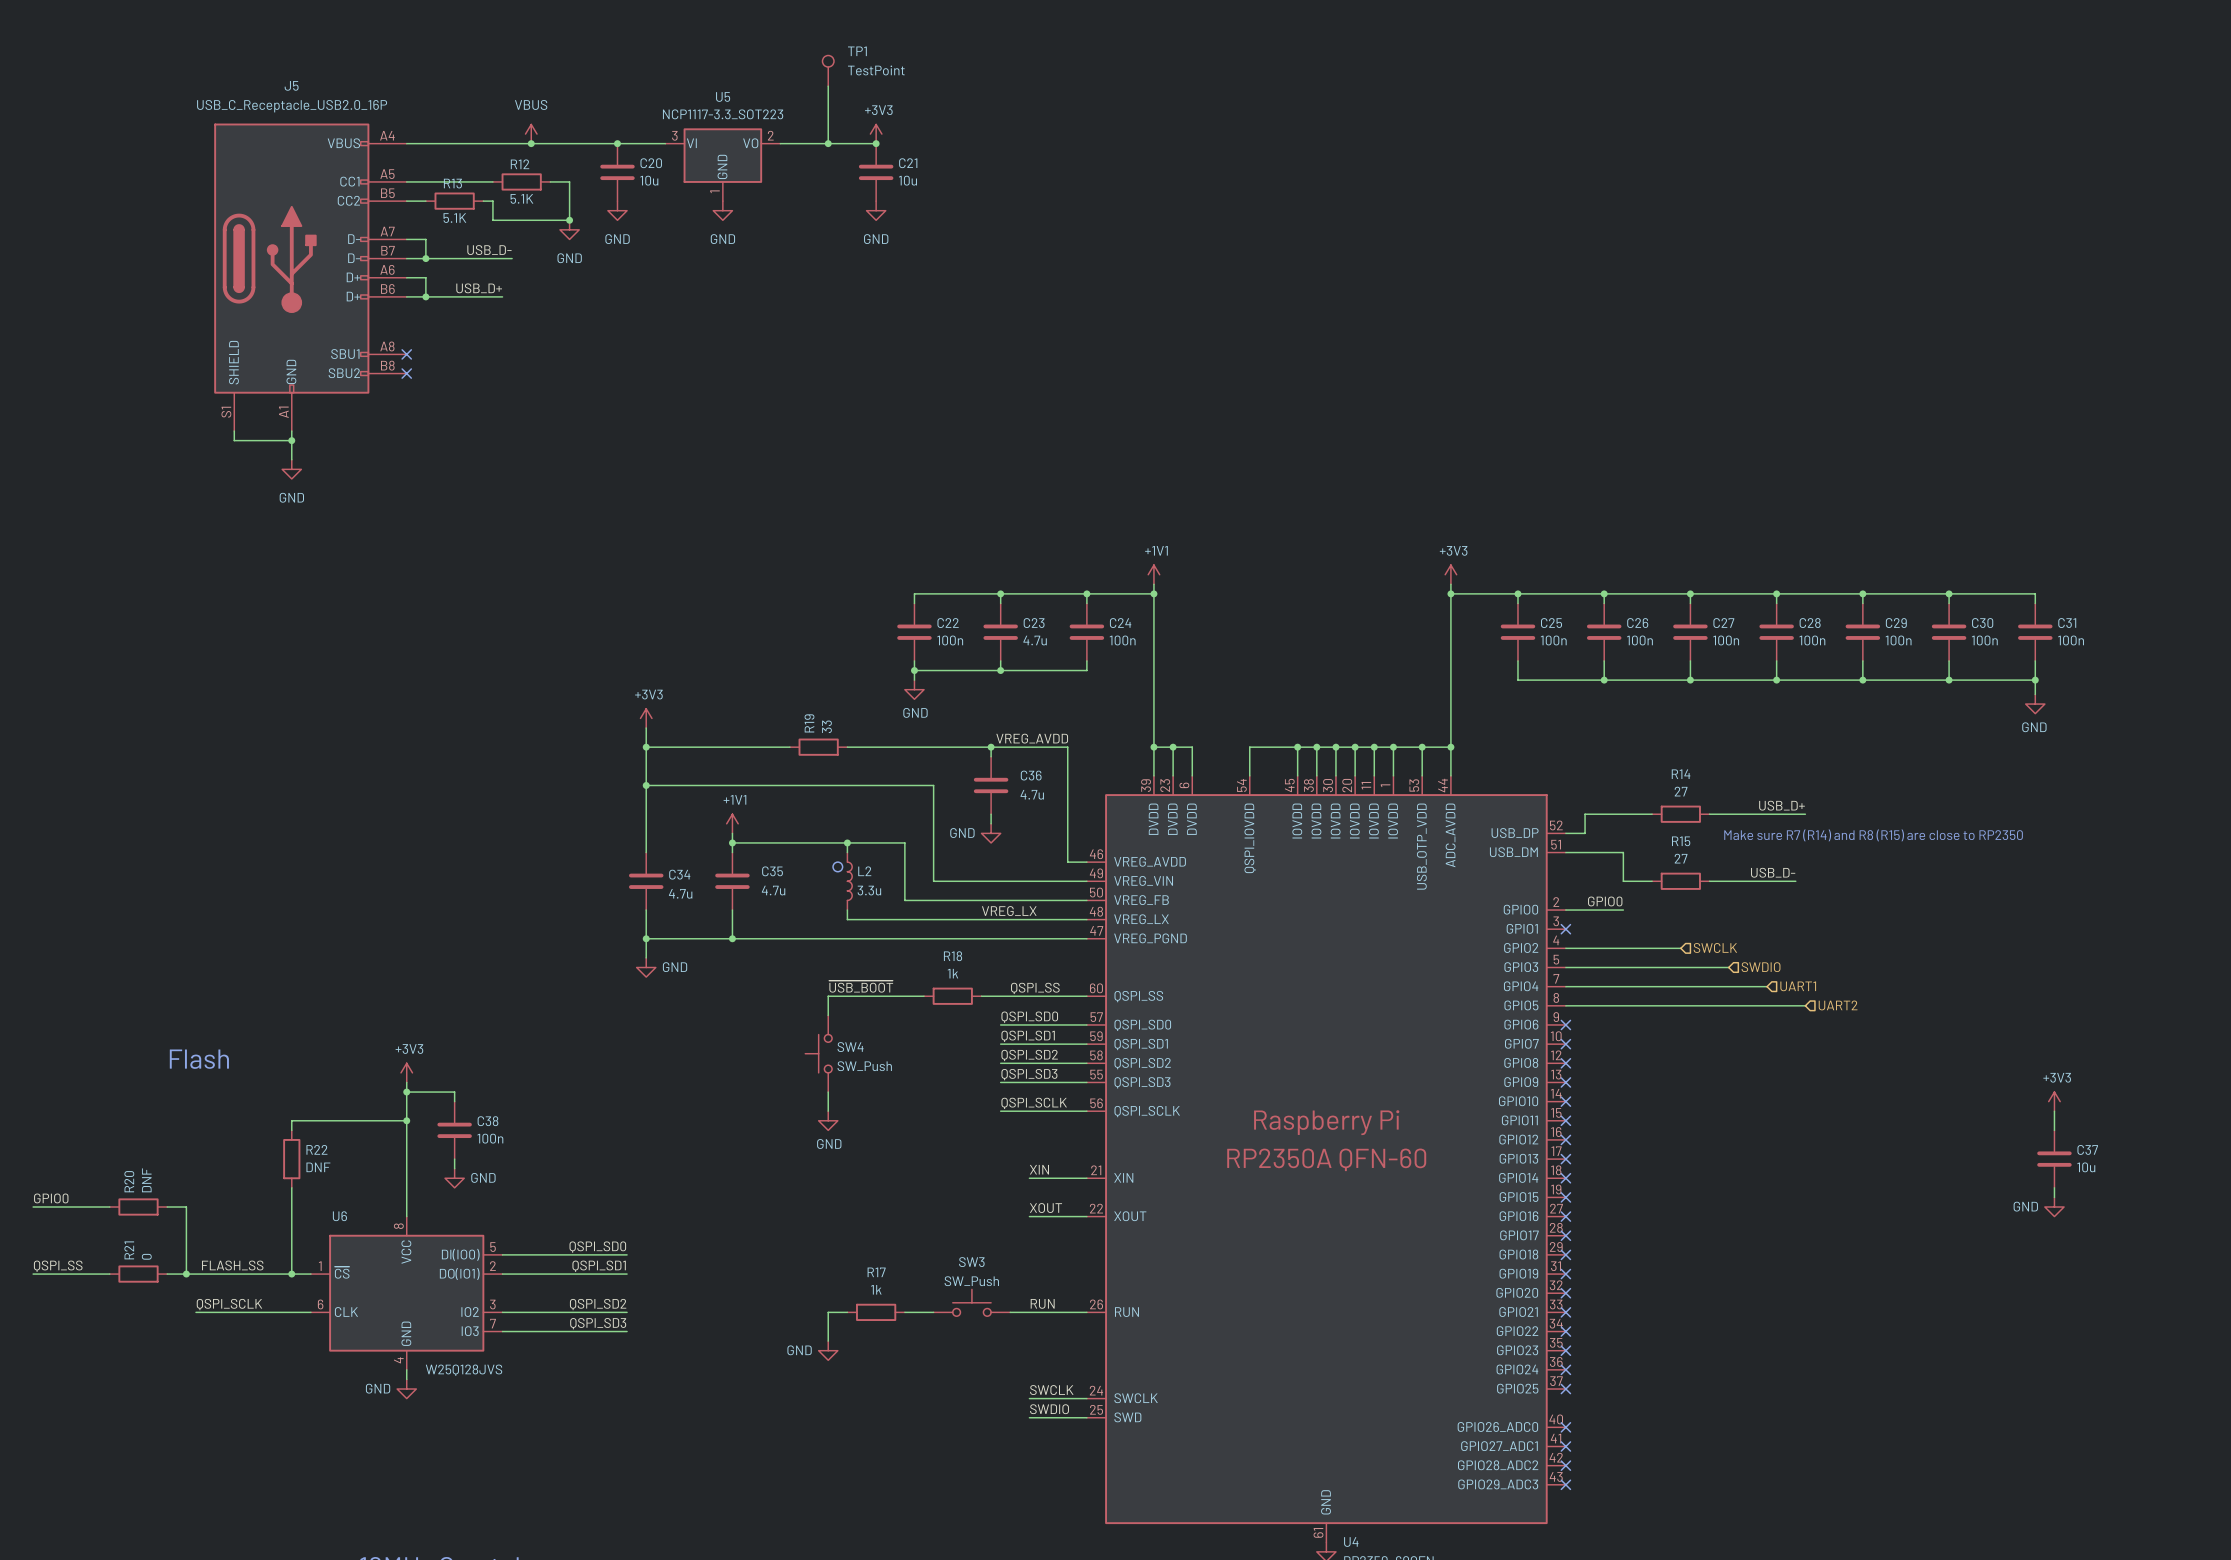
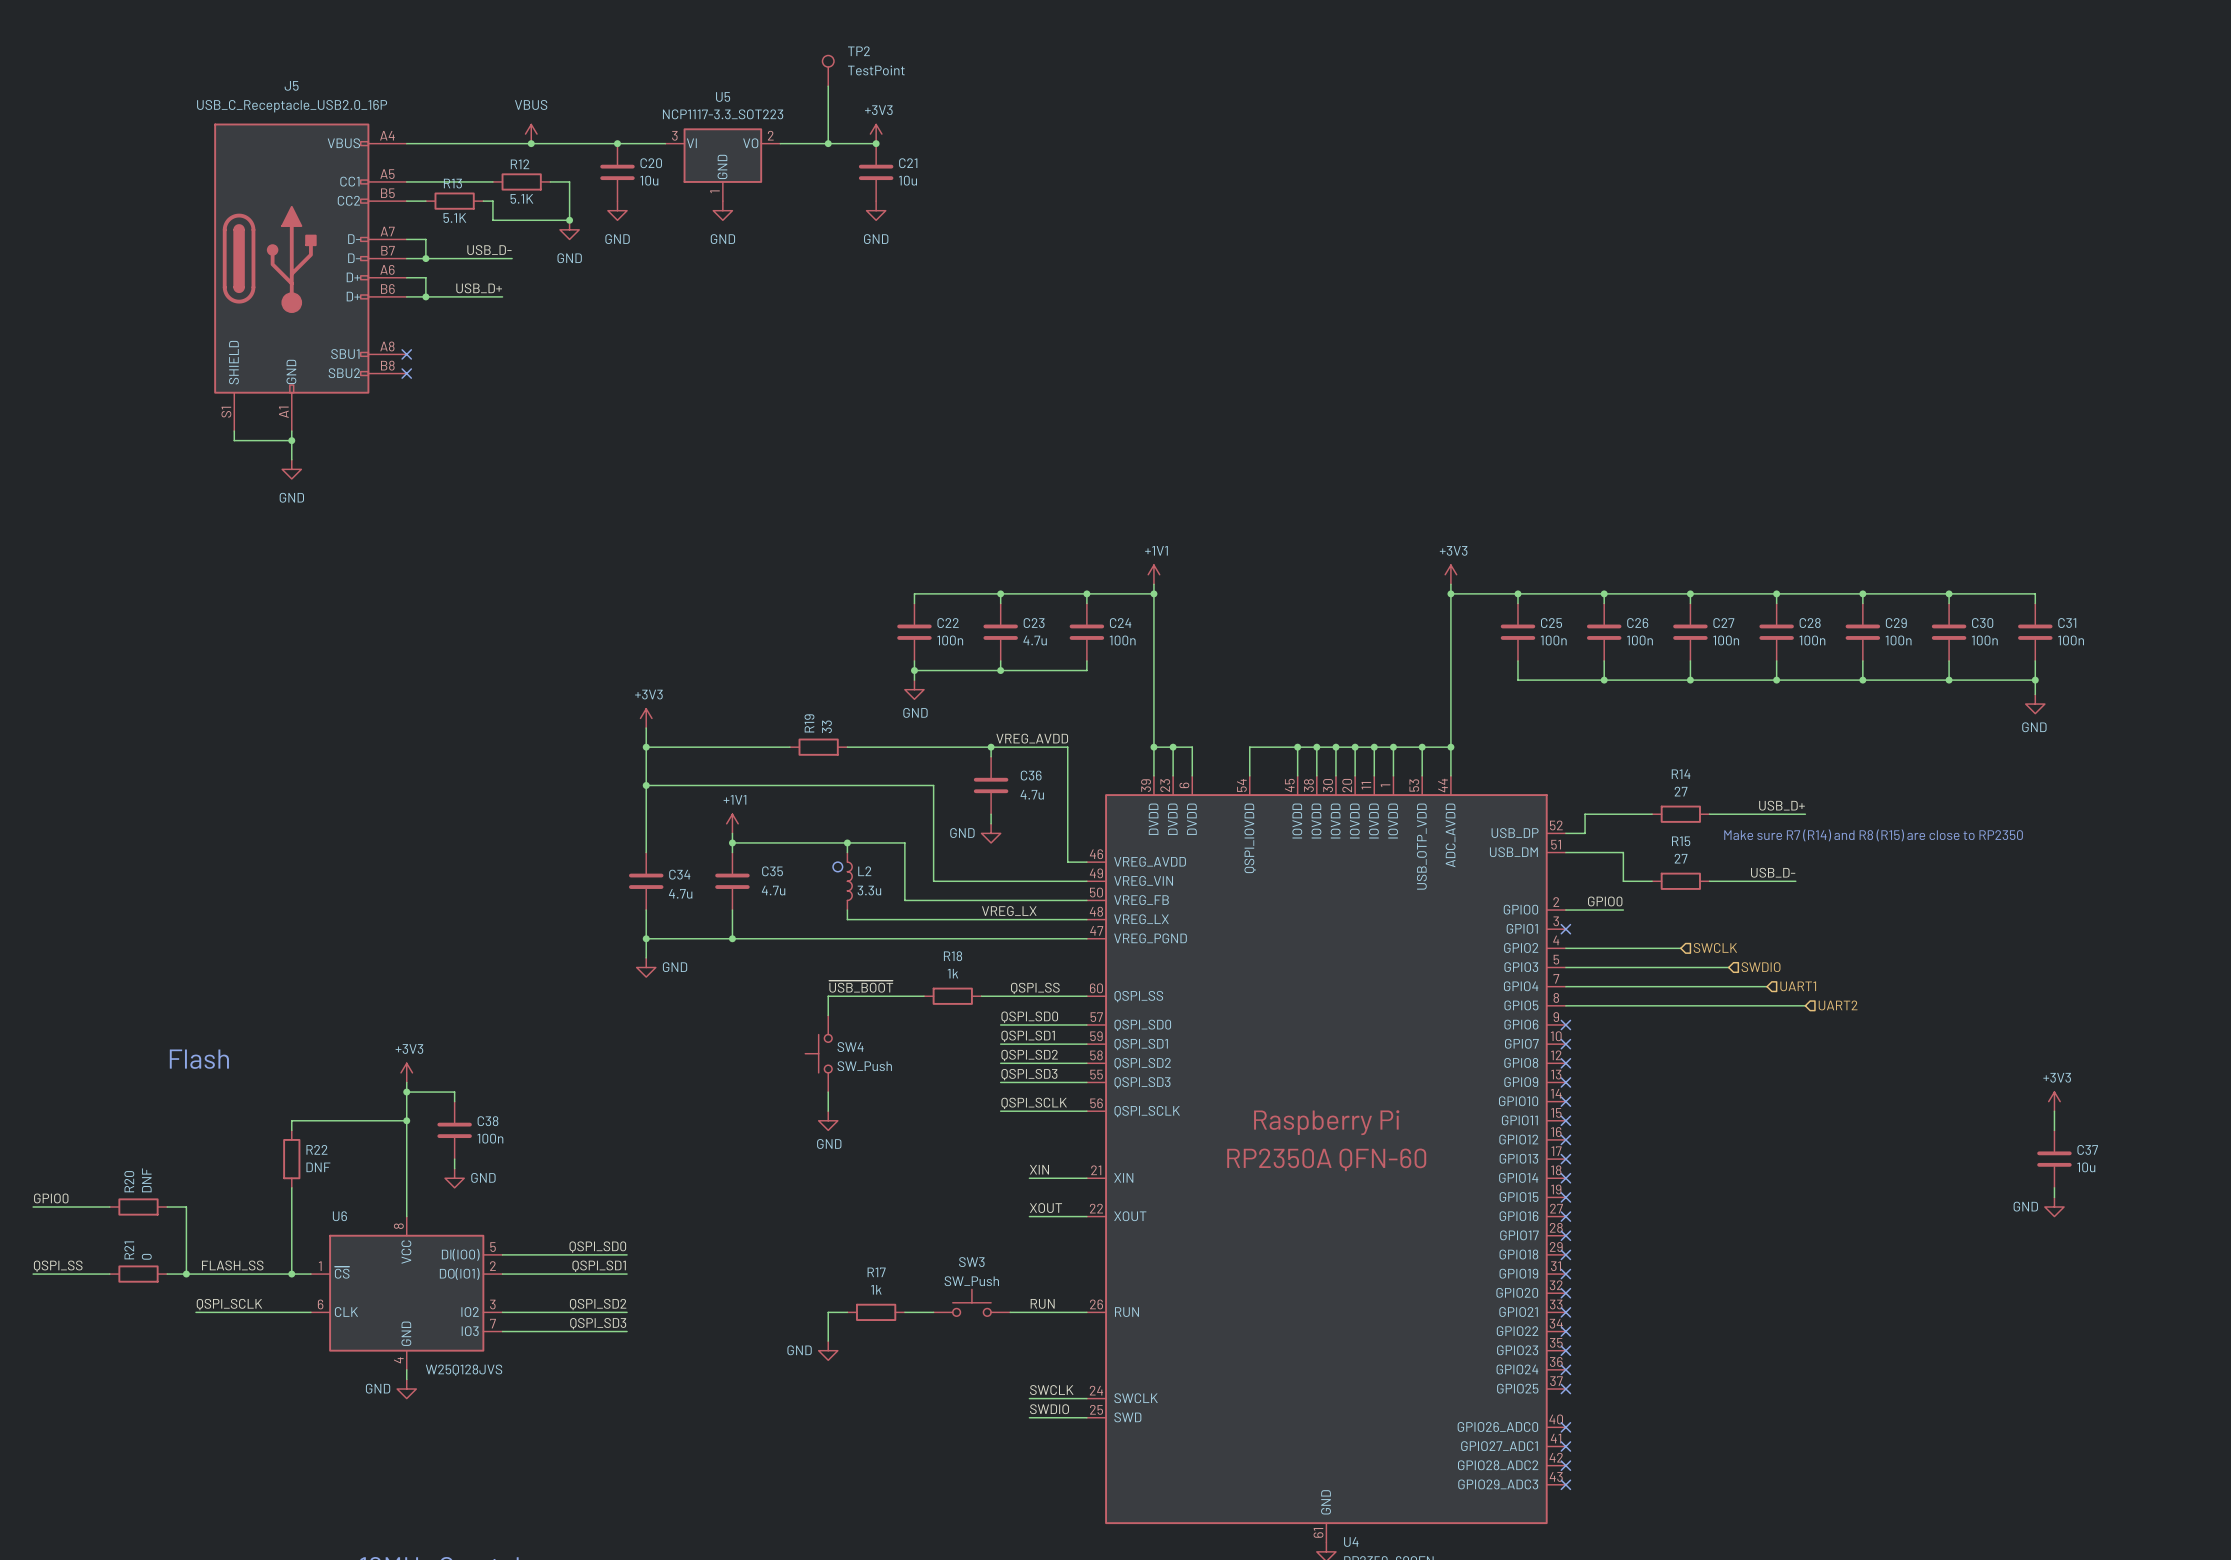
TP1 name: TP1 (857, 51) -> TP2 (858, 51)

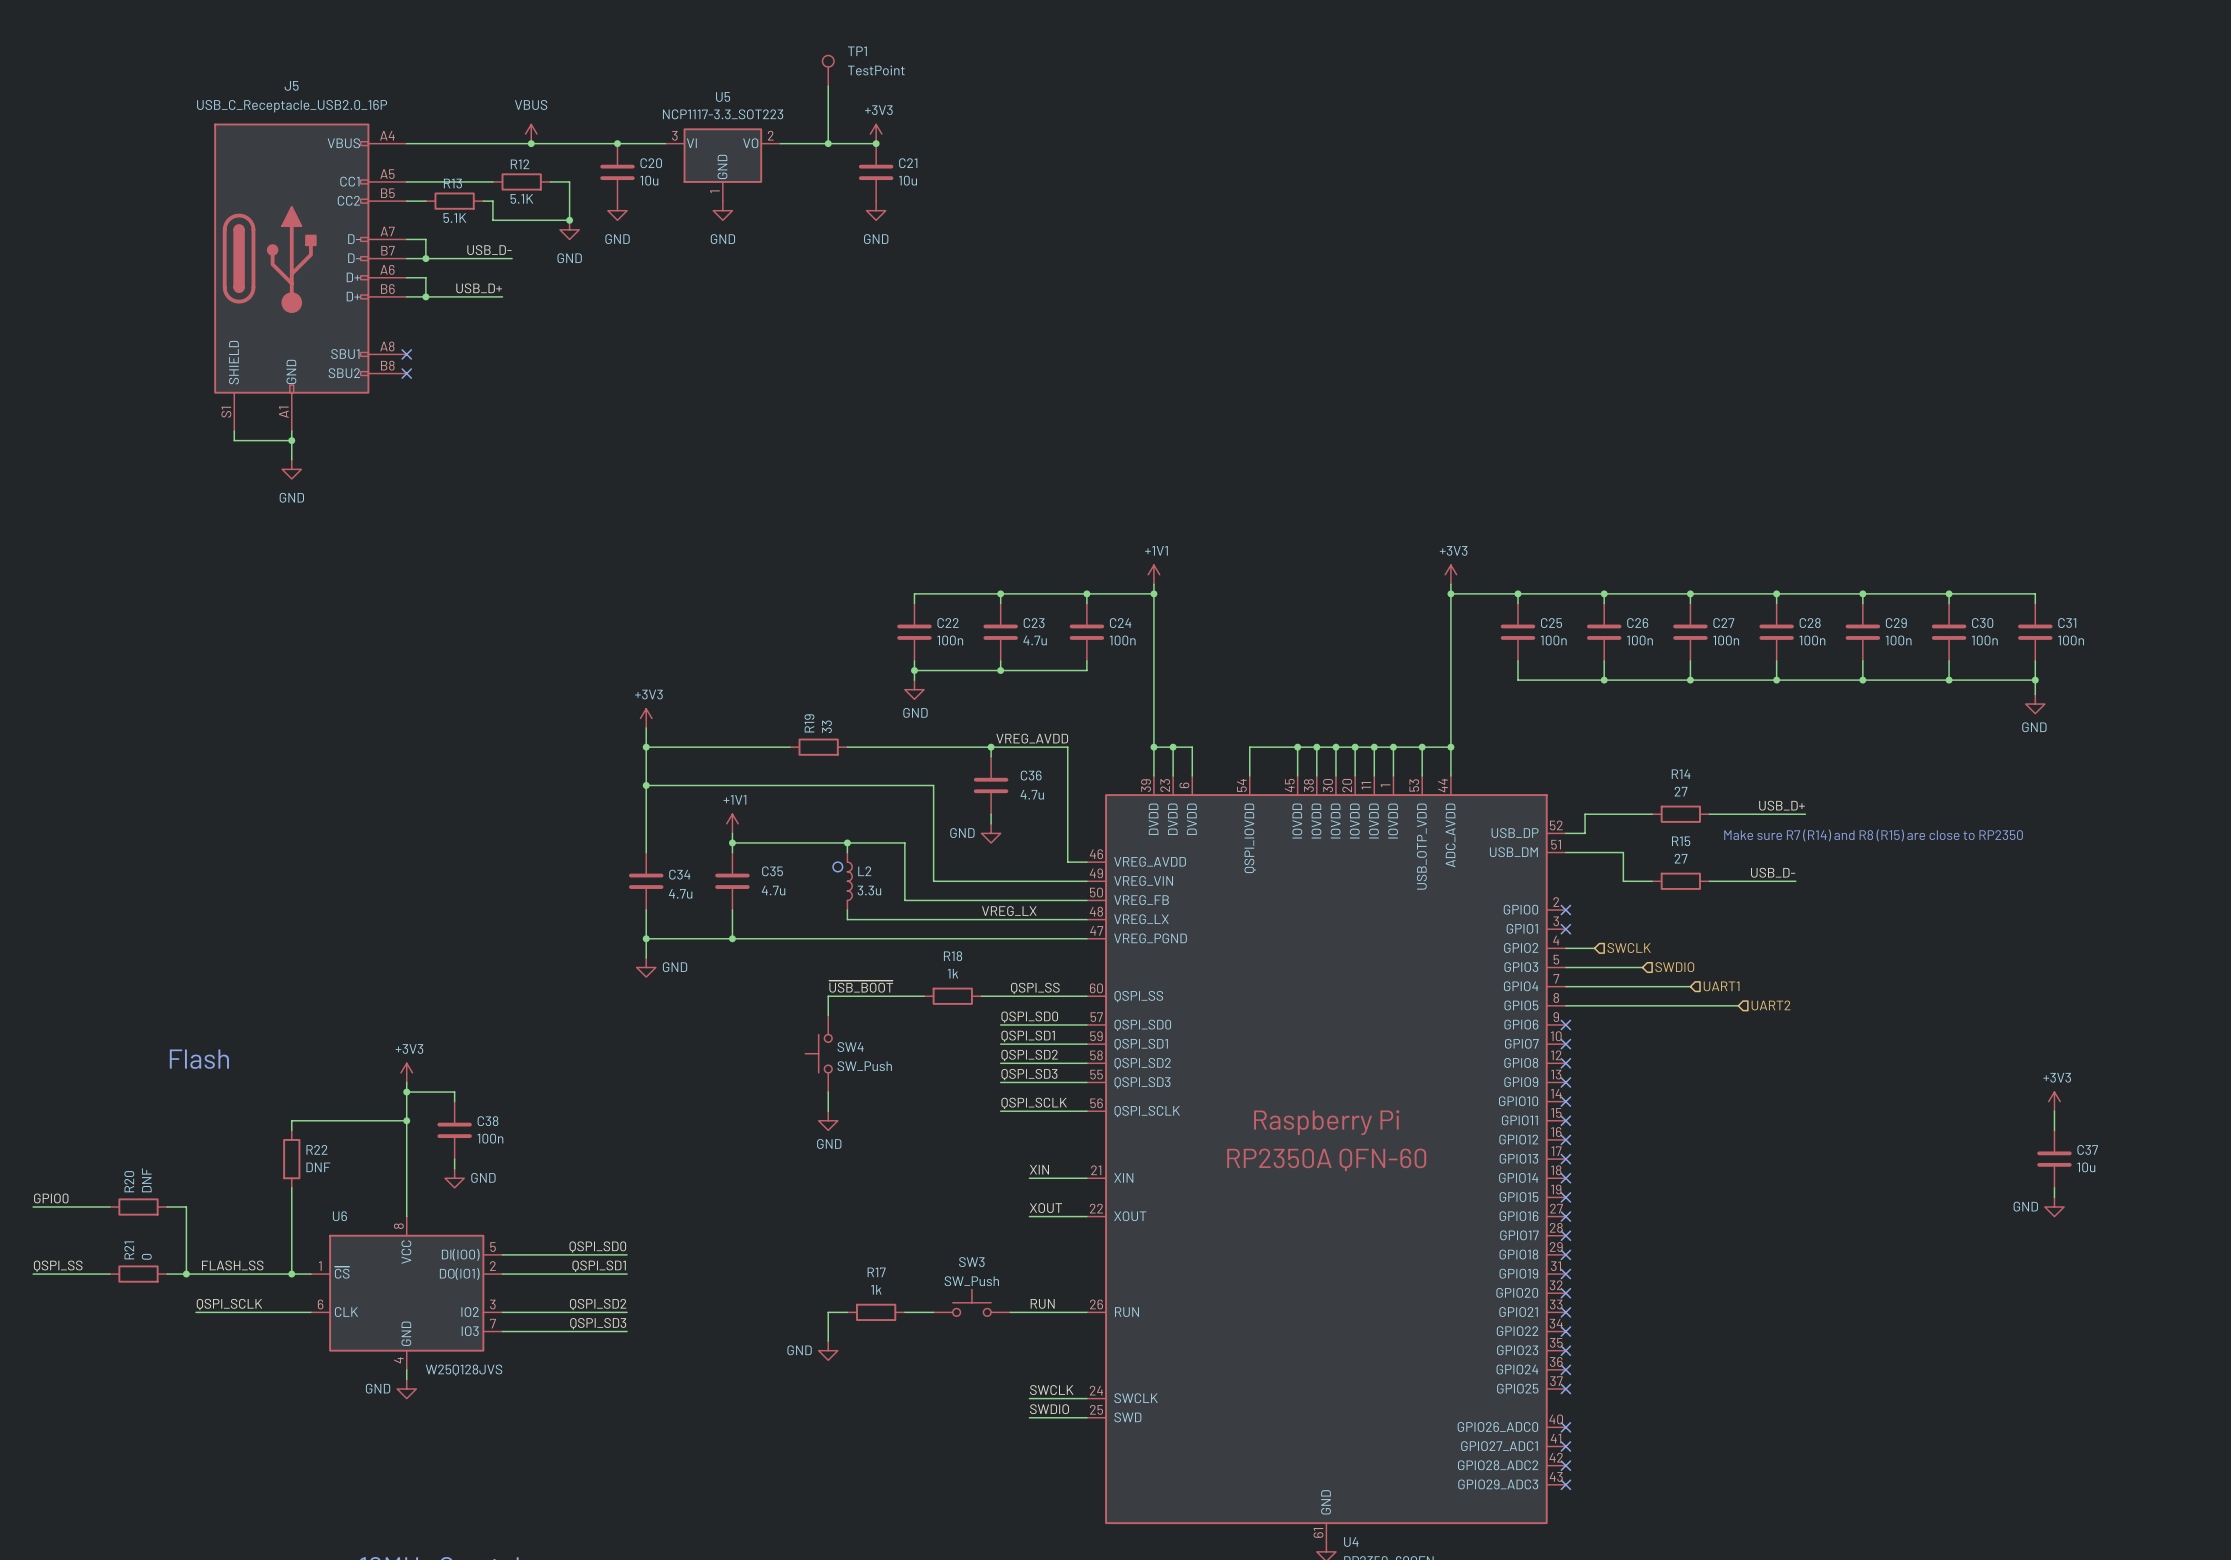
TP2 name: TP2 (858, 51) -> TP1 (857, 51)
label: GPIO0 (1605, 901) -> none
wire: (1565, 910) (1623, 910) -> none
no-connect mark: none -> (1565, 910)
hierarchical label position: SWCLK (1715, 947) -> SWCLK (1629, 947)
wire: (1594, 948) (1680, 948) -> none
wire: (1642, 967) (1728, 967) -> none
hierarchical label position: SWDIO (1761, 967) -> SWDIO (1674, 967)
wire: (1690, 986) (1767, 986) -> none
hierarchical label position: UART1 (1798, 986) -> UART1 (1721, 986)
wire: (1738, 1005) (1805, 1005) -> none
hierarchical label position: UART2 (1838, 1005) -> UART2 (1771, 1005)

